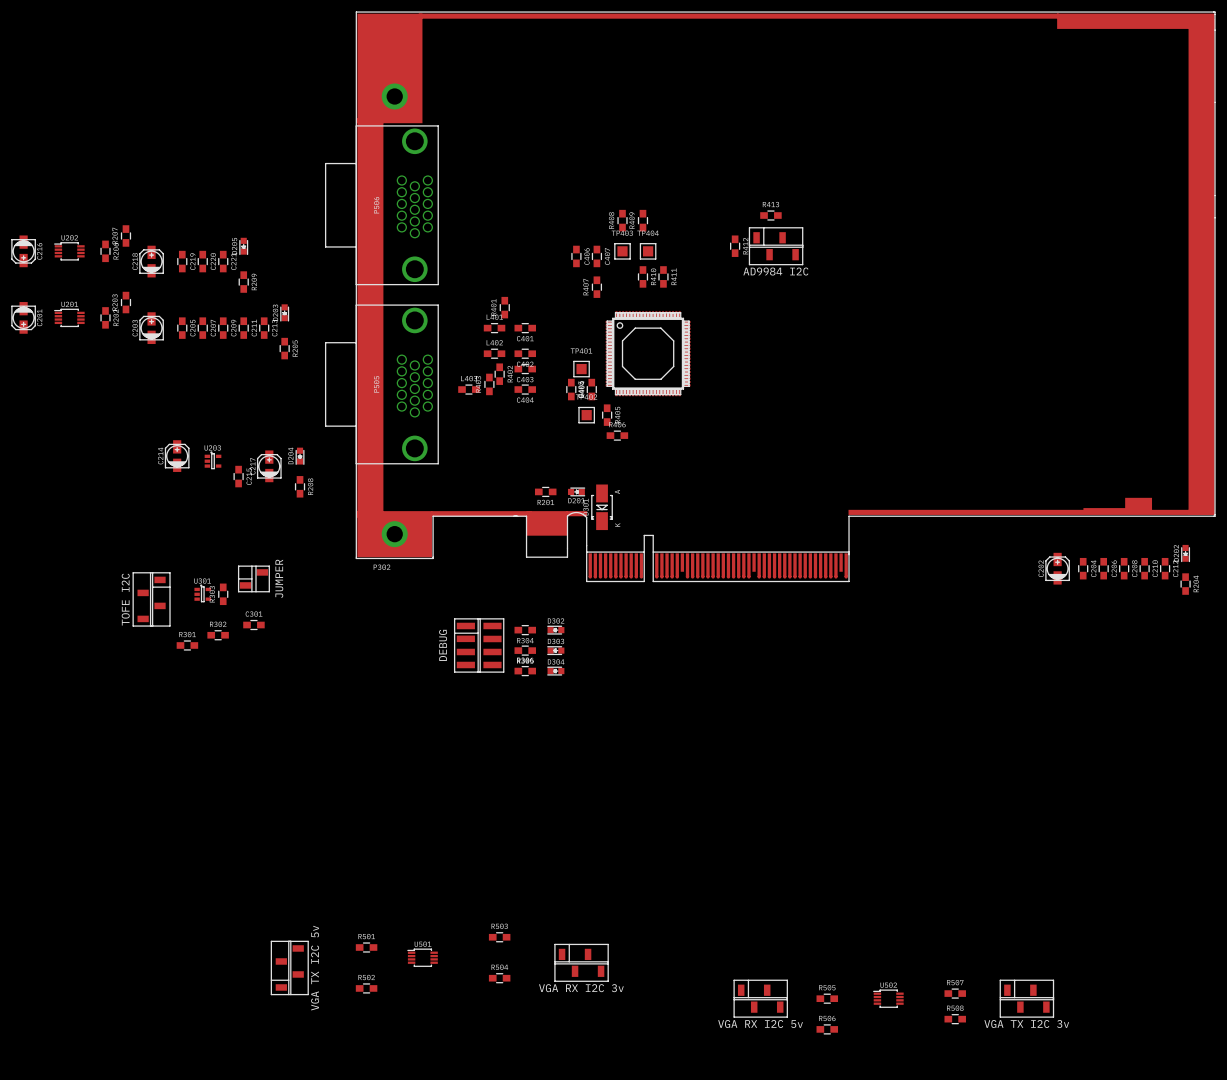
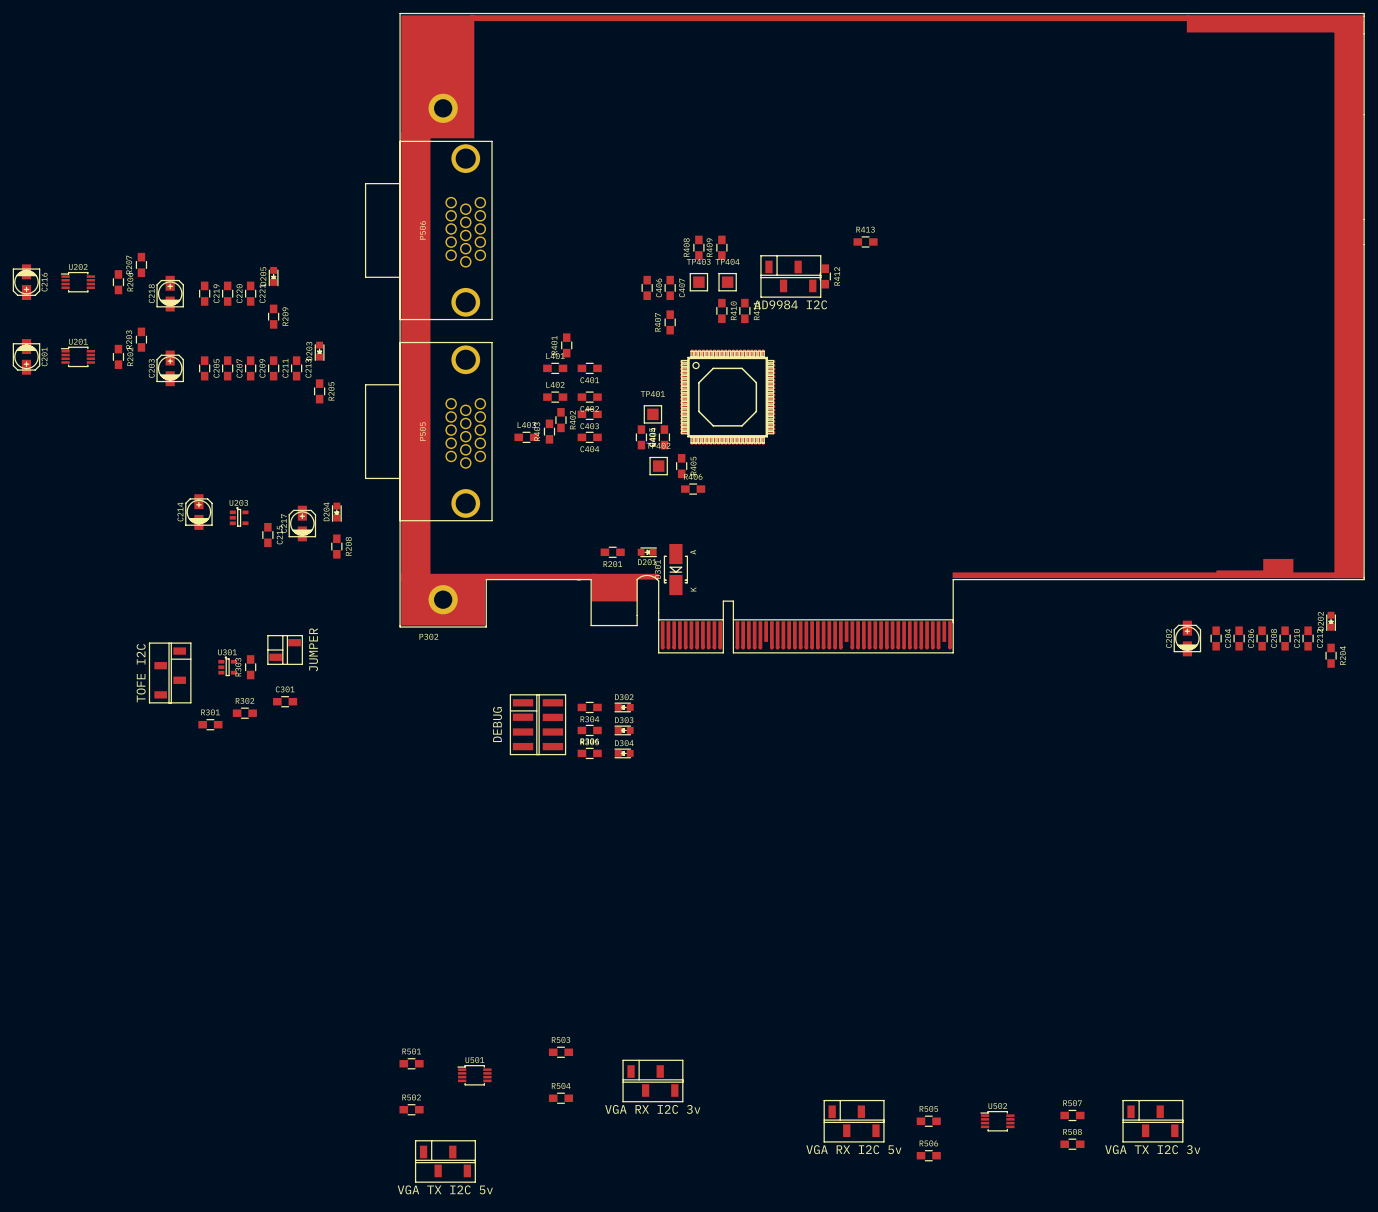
part position: (776, 246) -> (790, 276)
part rotation: 0° (289, 967) -> 90° clockwise (445, 1161)
part position: (289, 967) -> (445, 1161)

